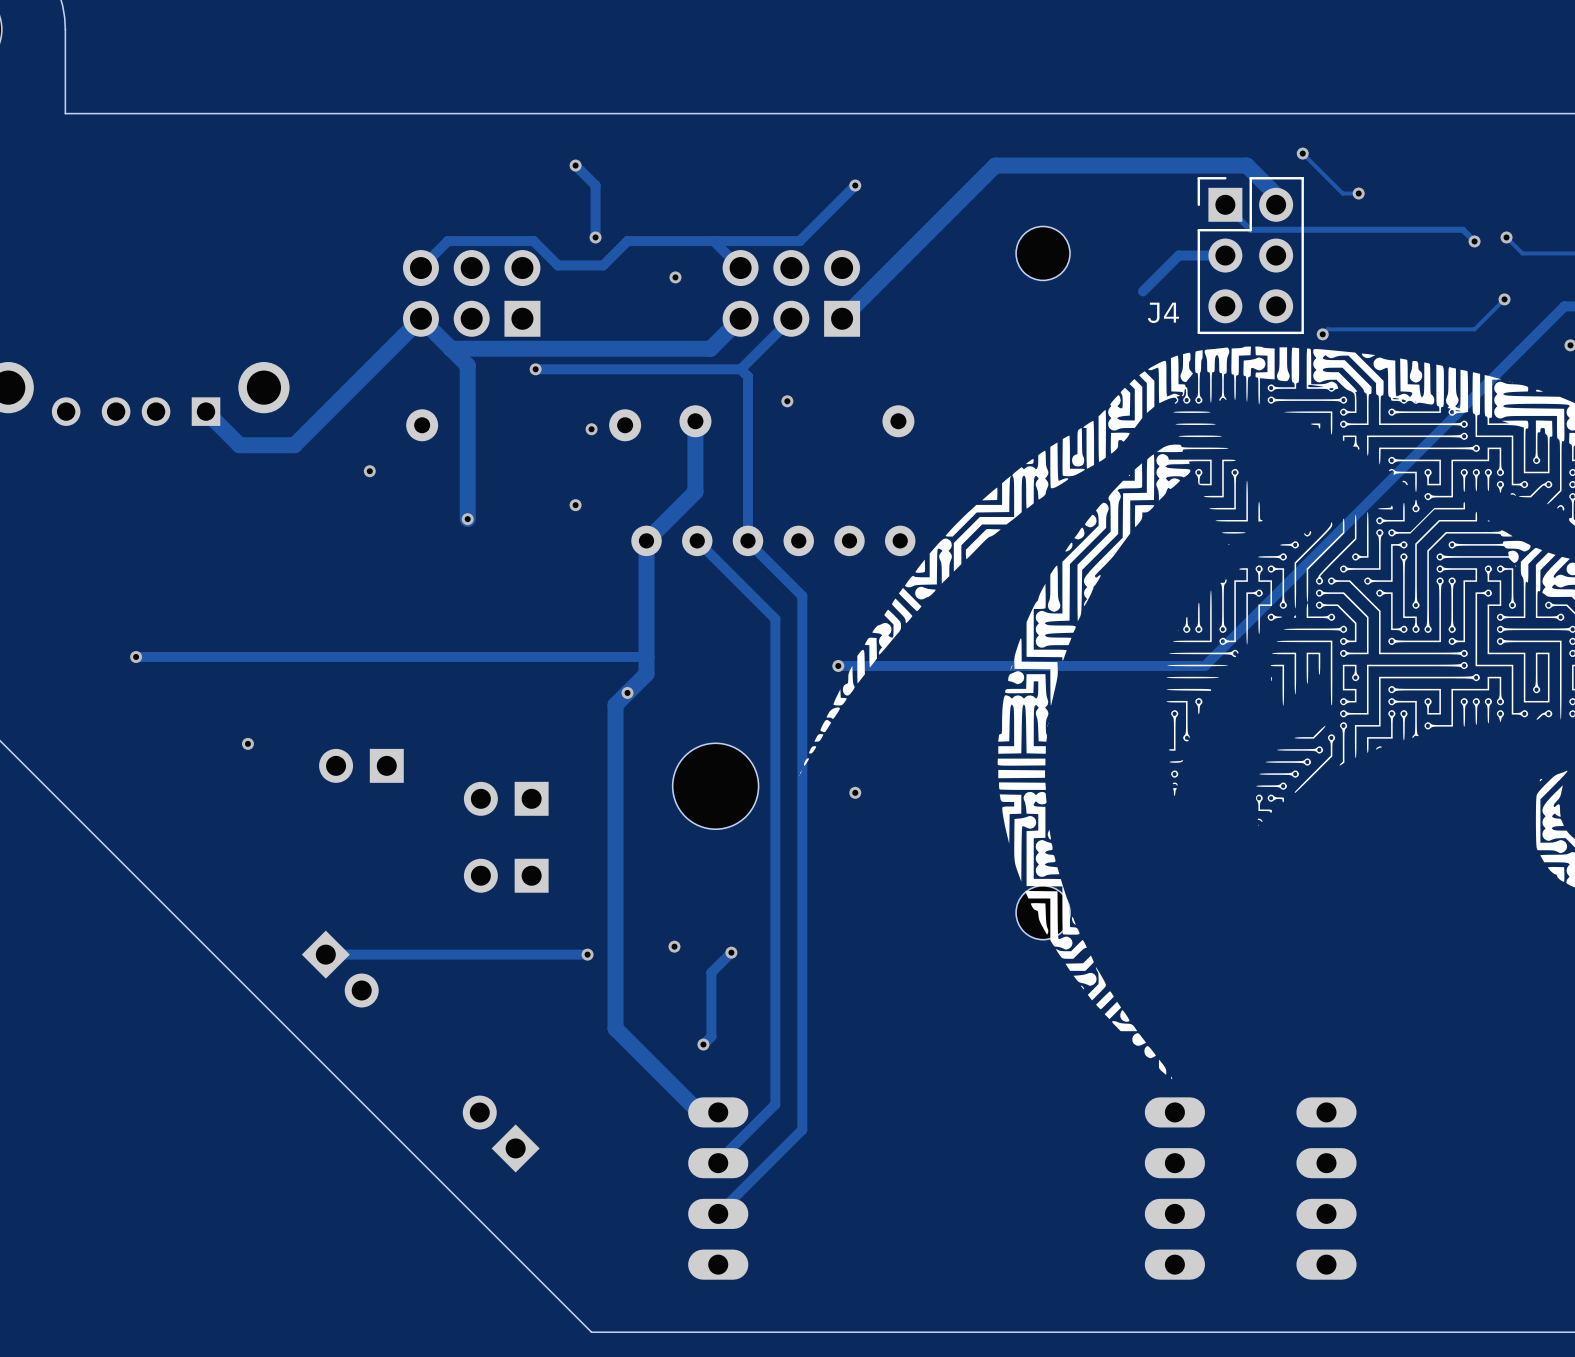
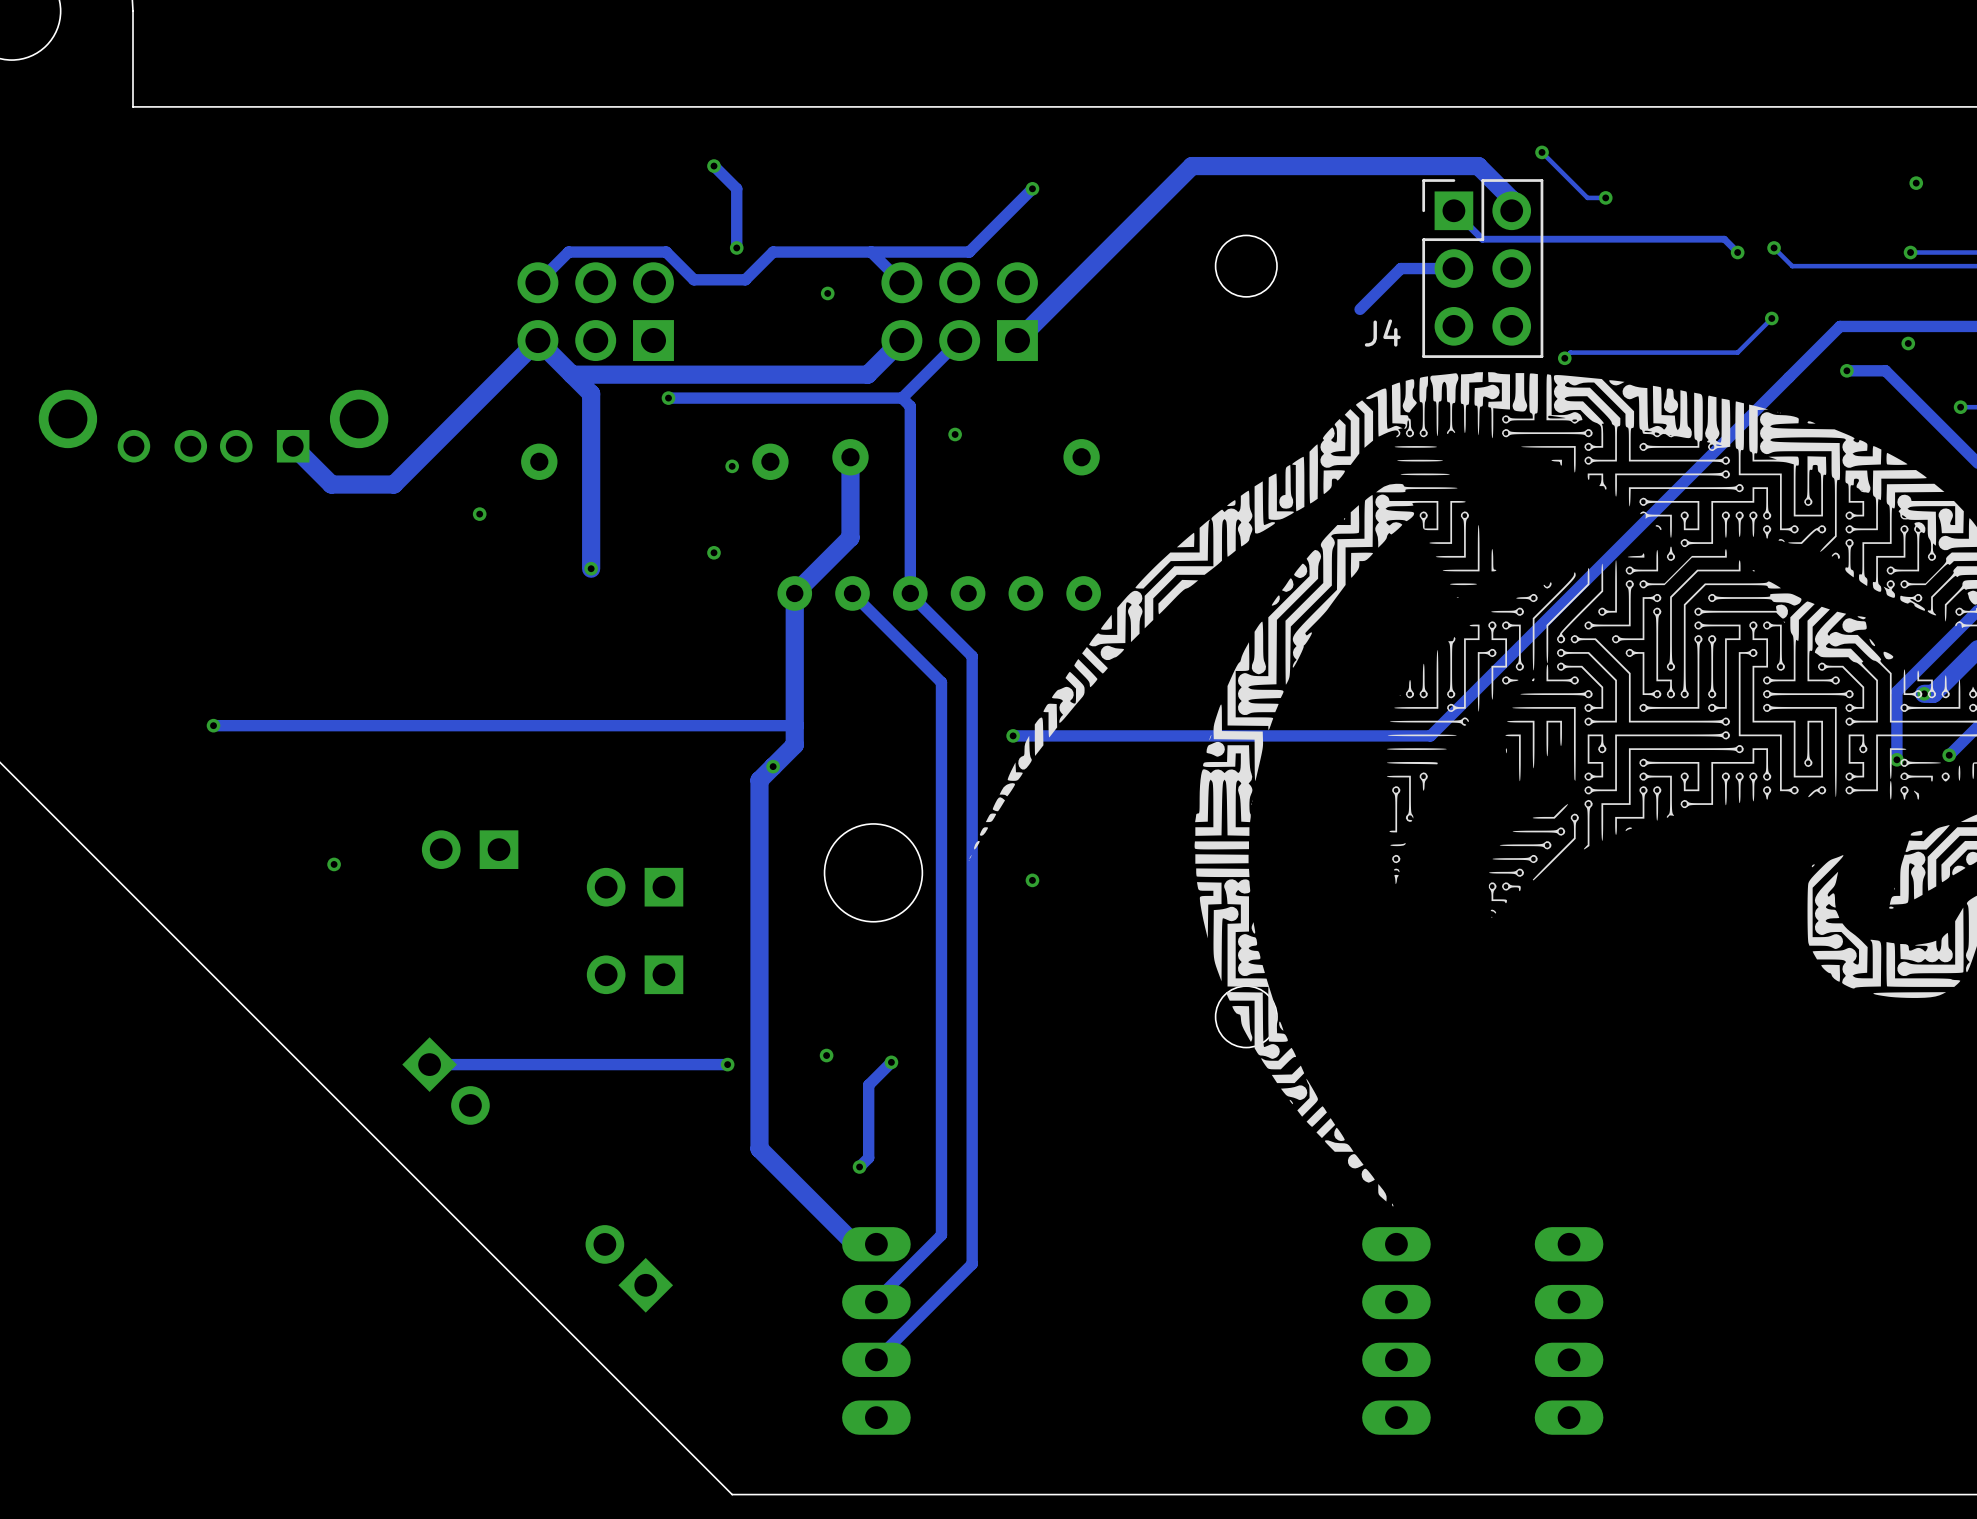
via position: (247, 743) -> (334, 864)

